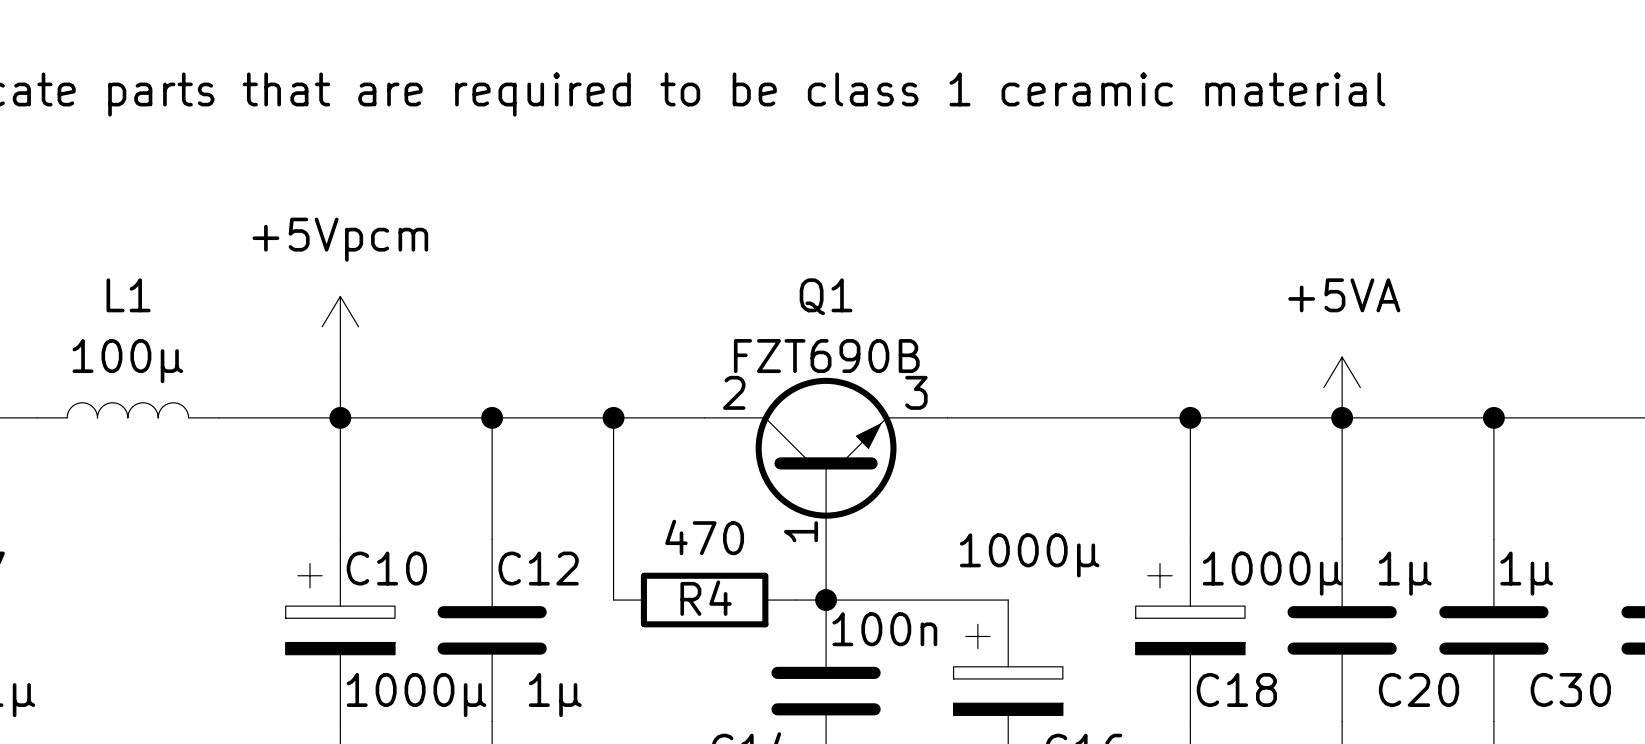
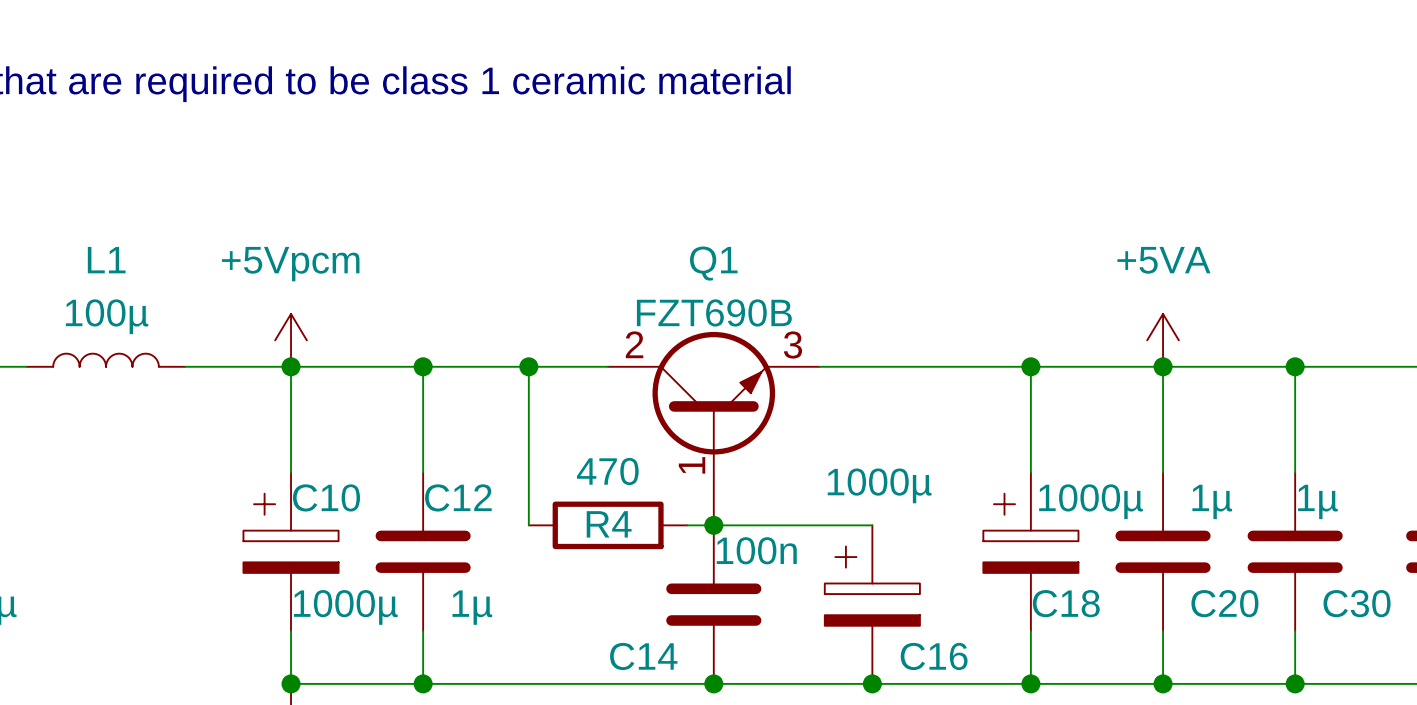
power symbol position: +5Vpcm (340, 326) -> +5Vpcm (291, 340)

